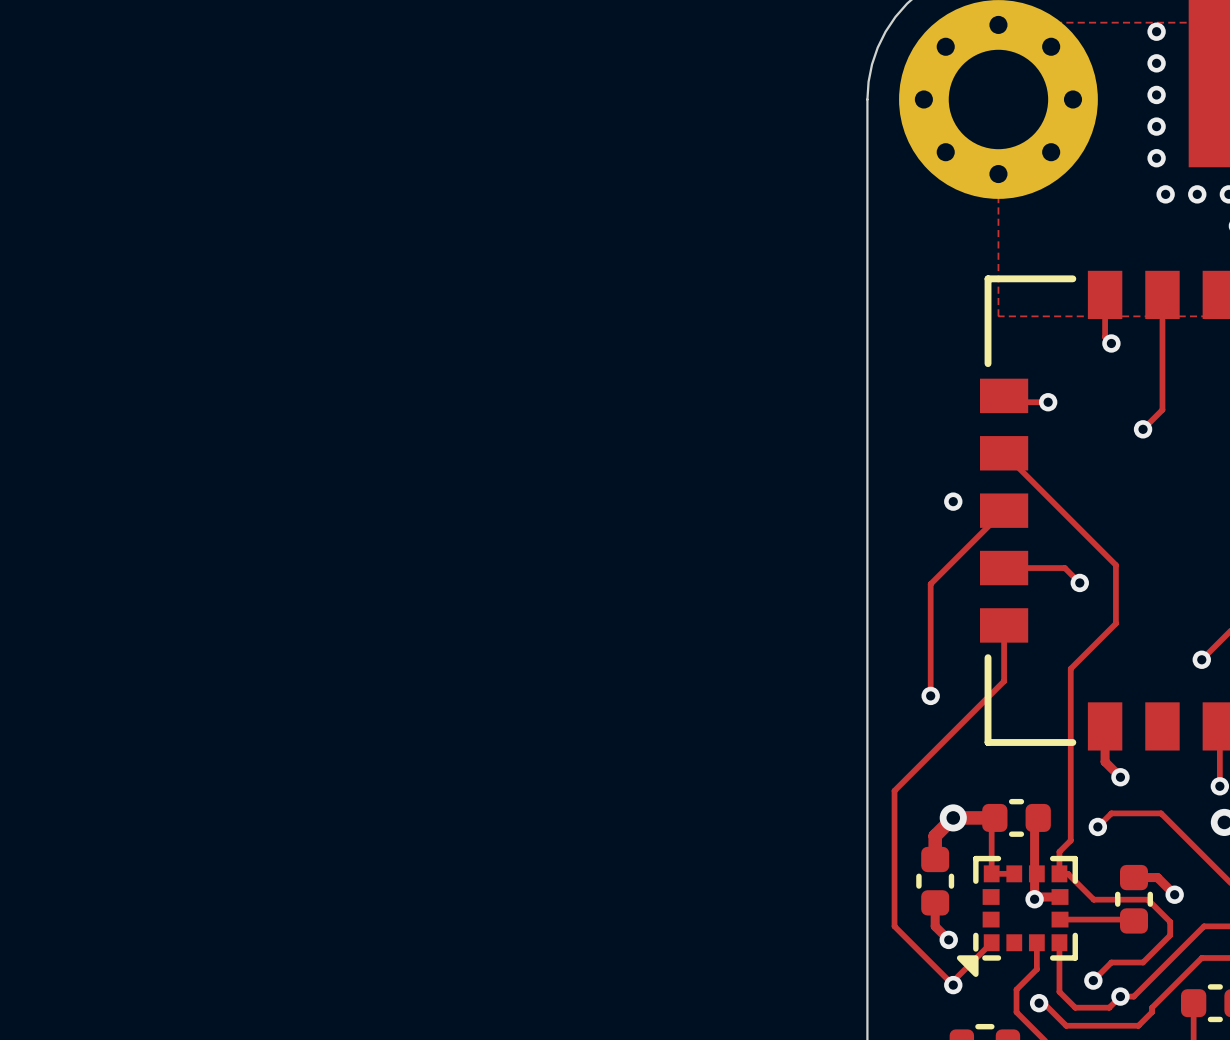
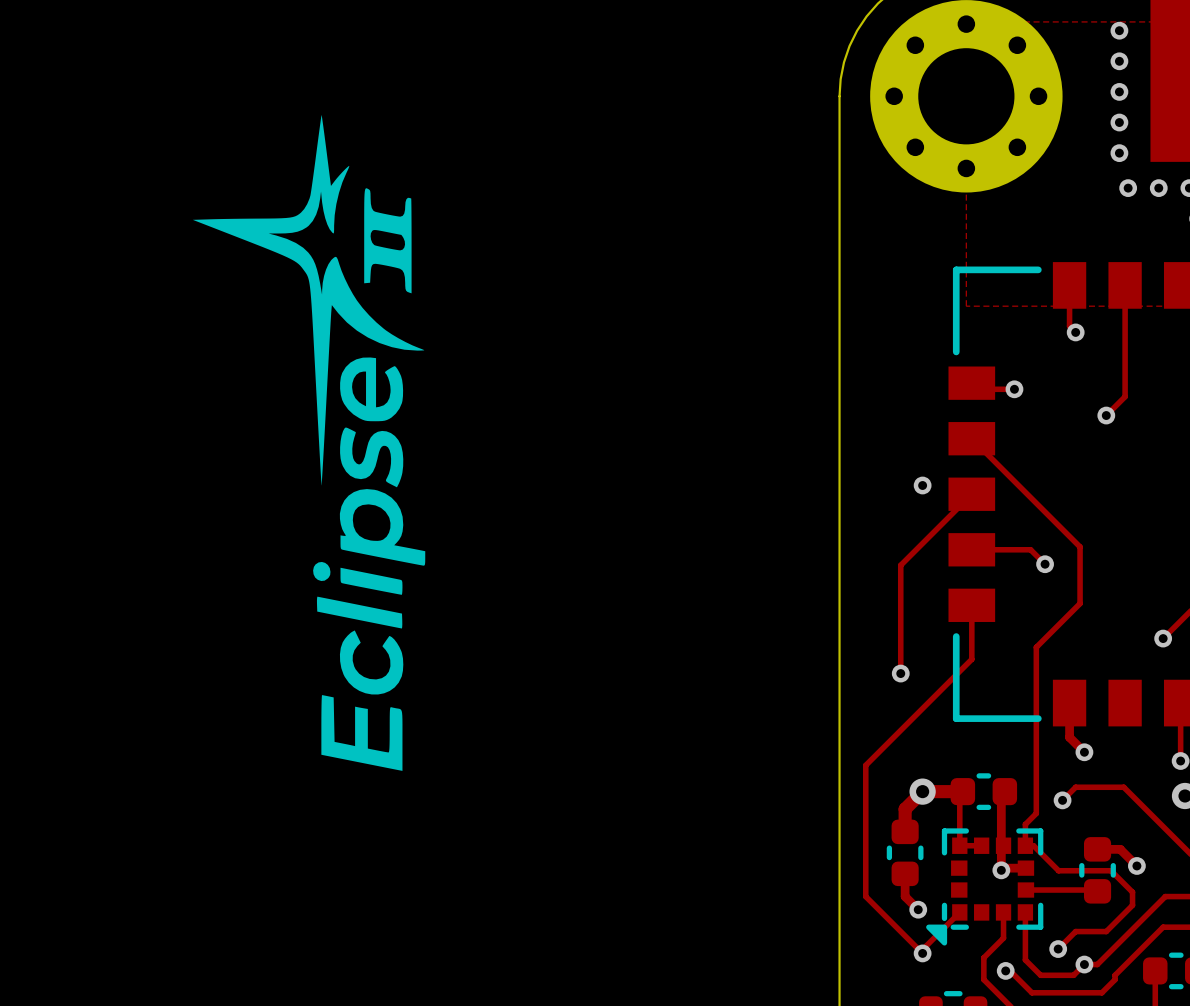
drawing: none -> [192, 114, 426, 771]

